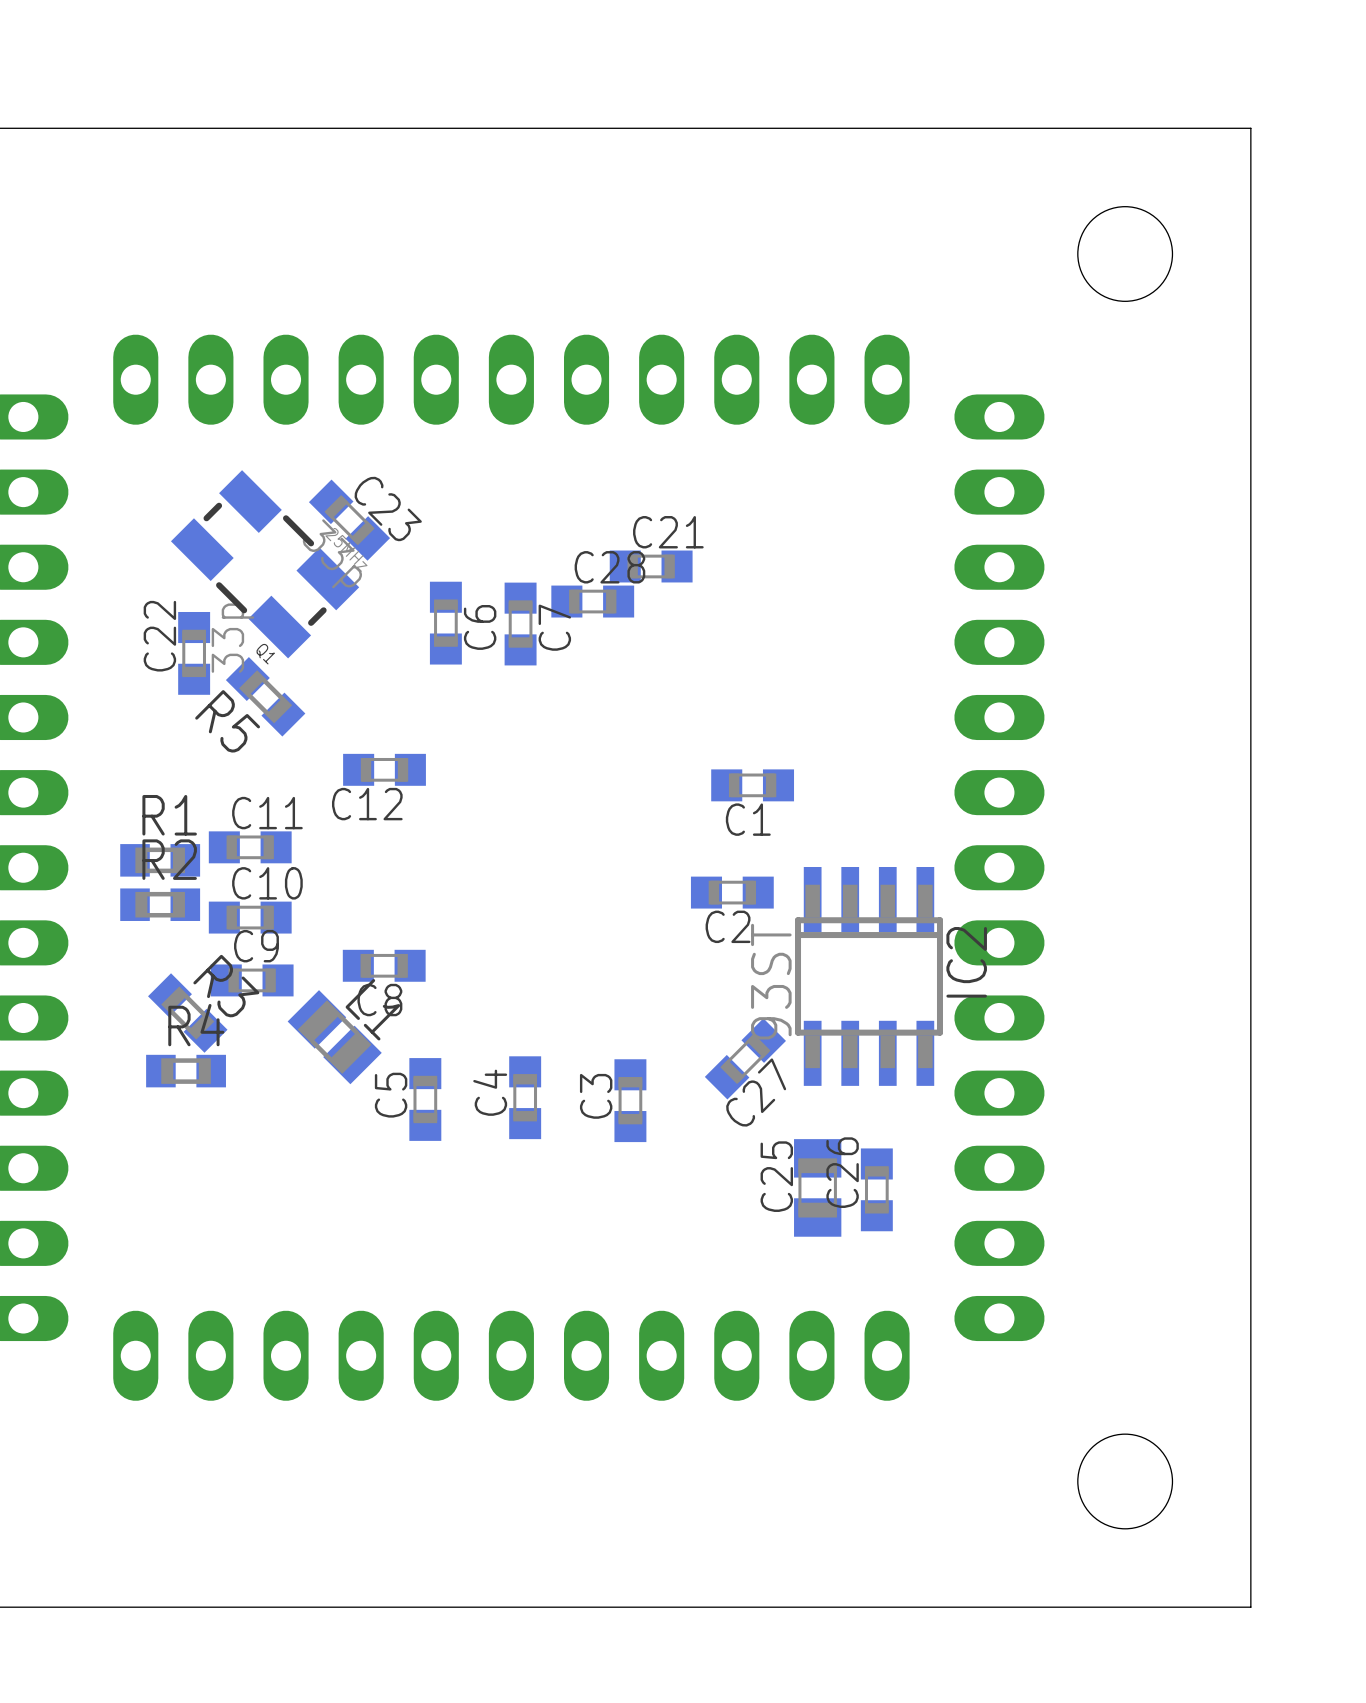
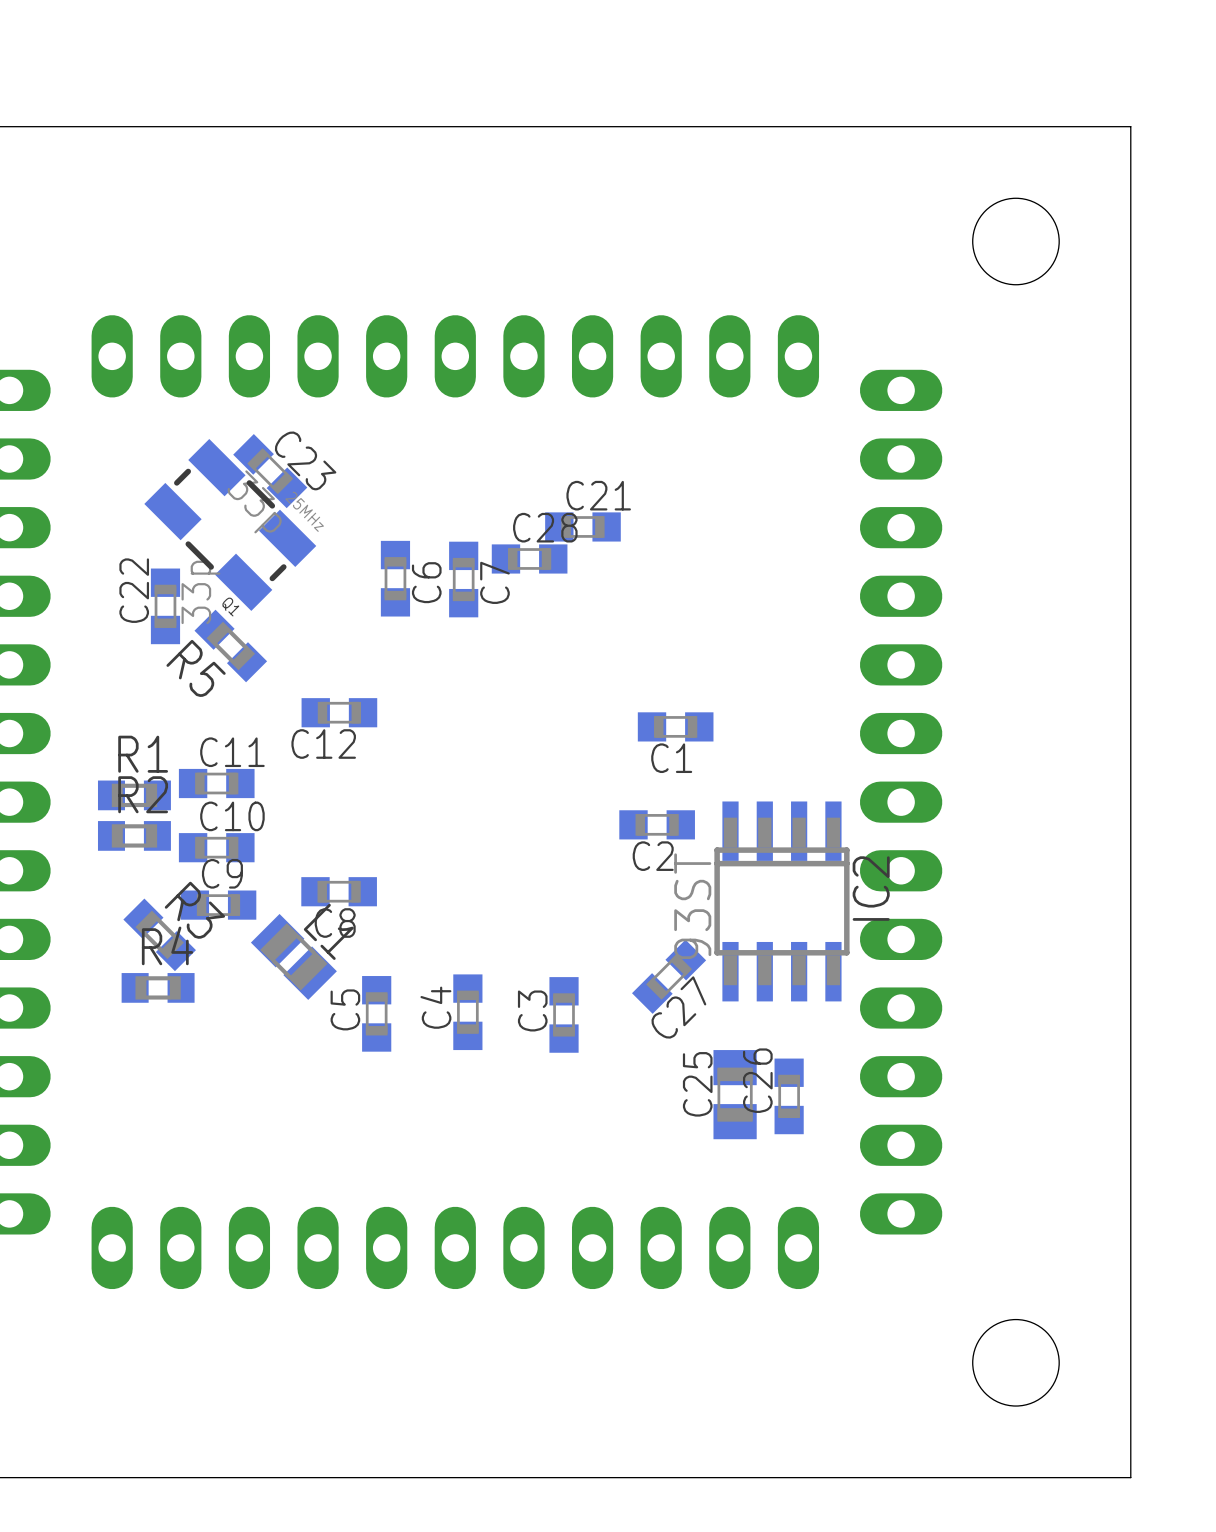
C23 position: (349, 520) -> (270, 471)

